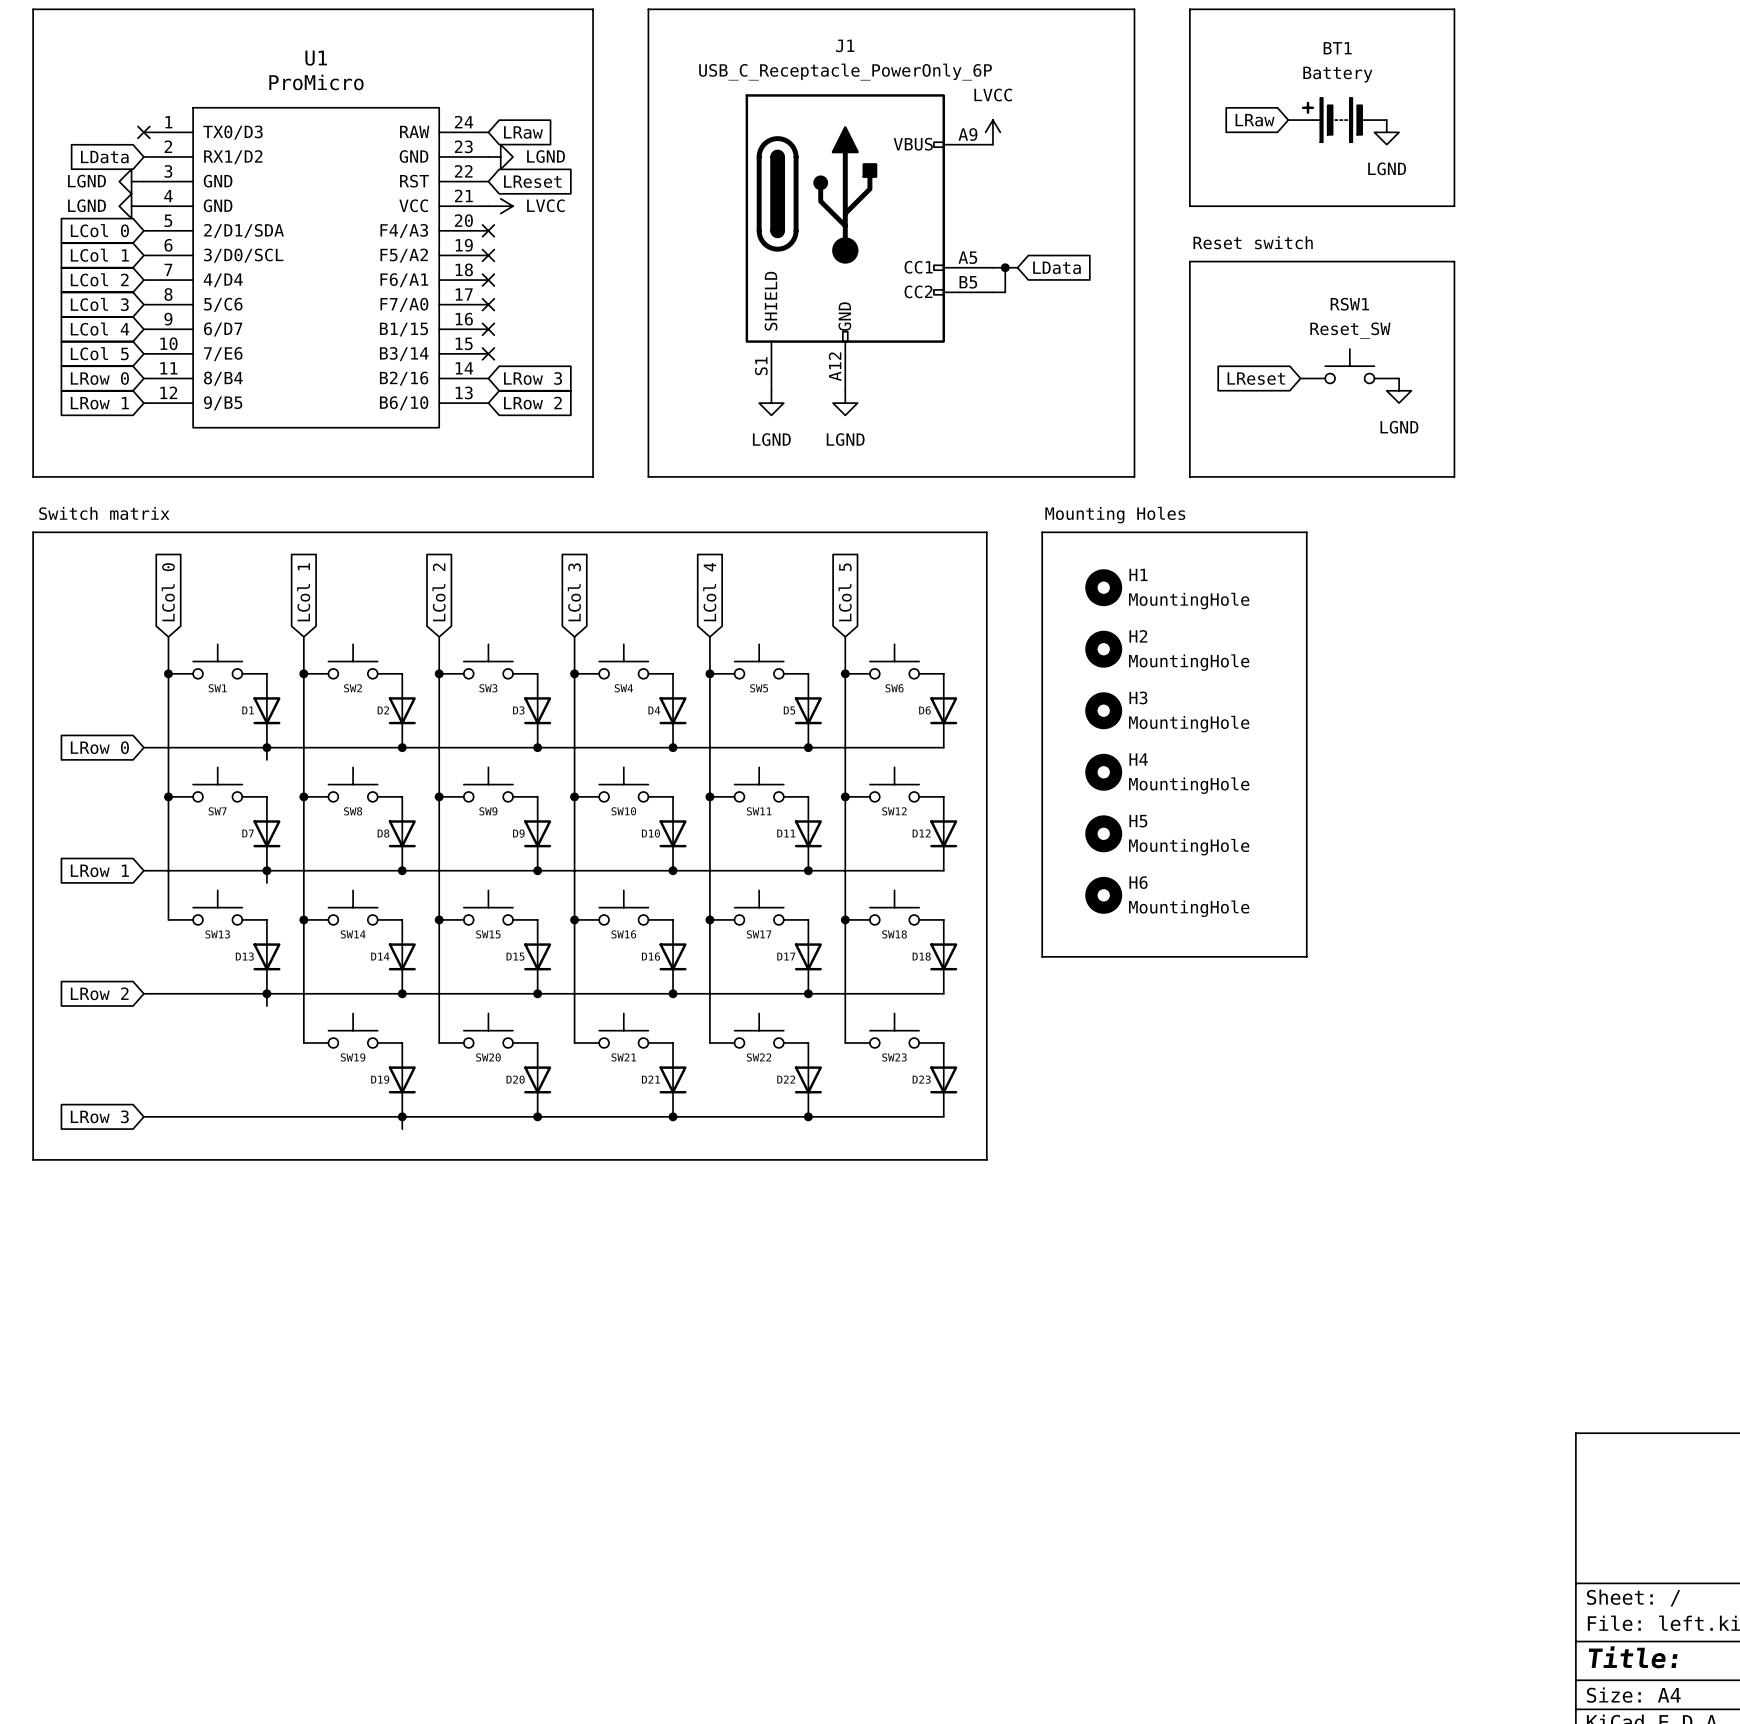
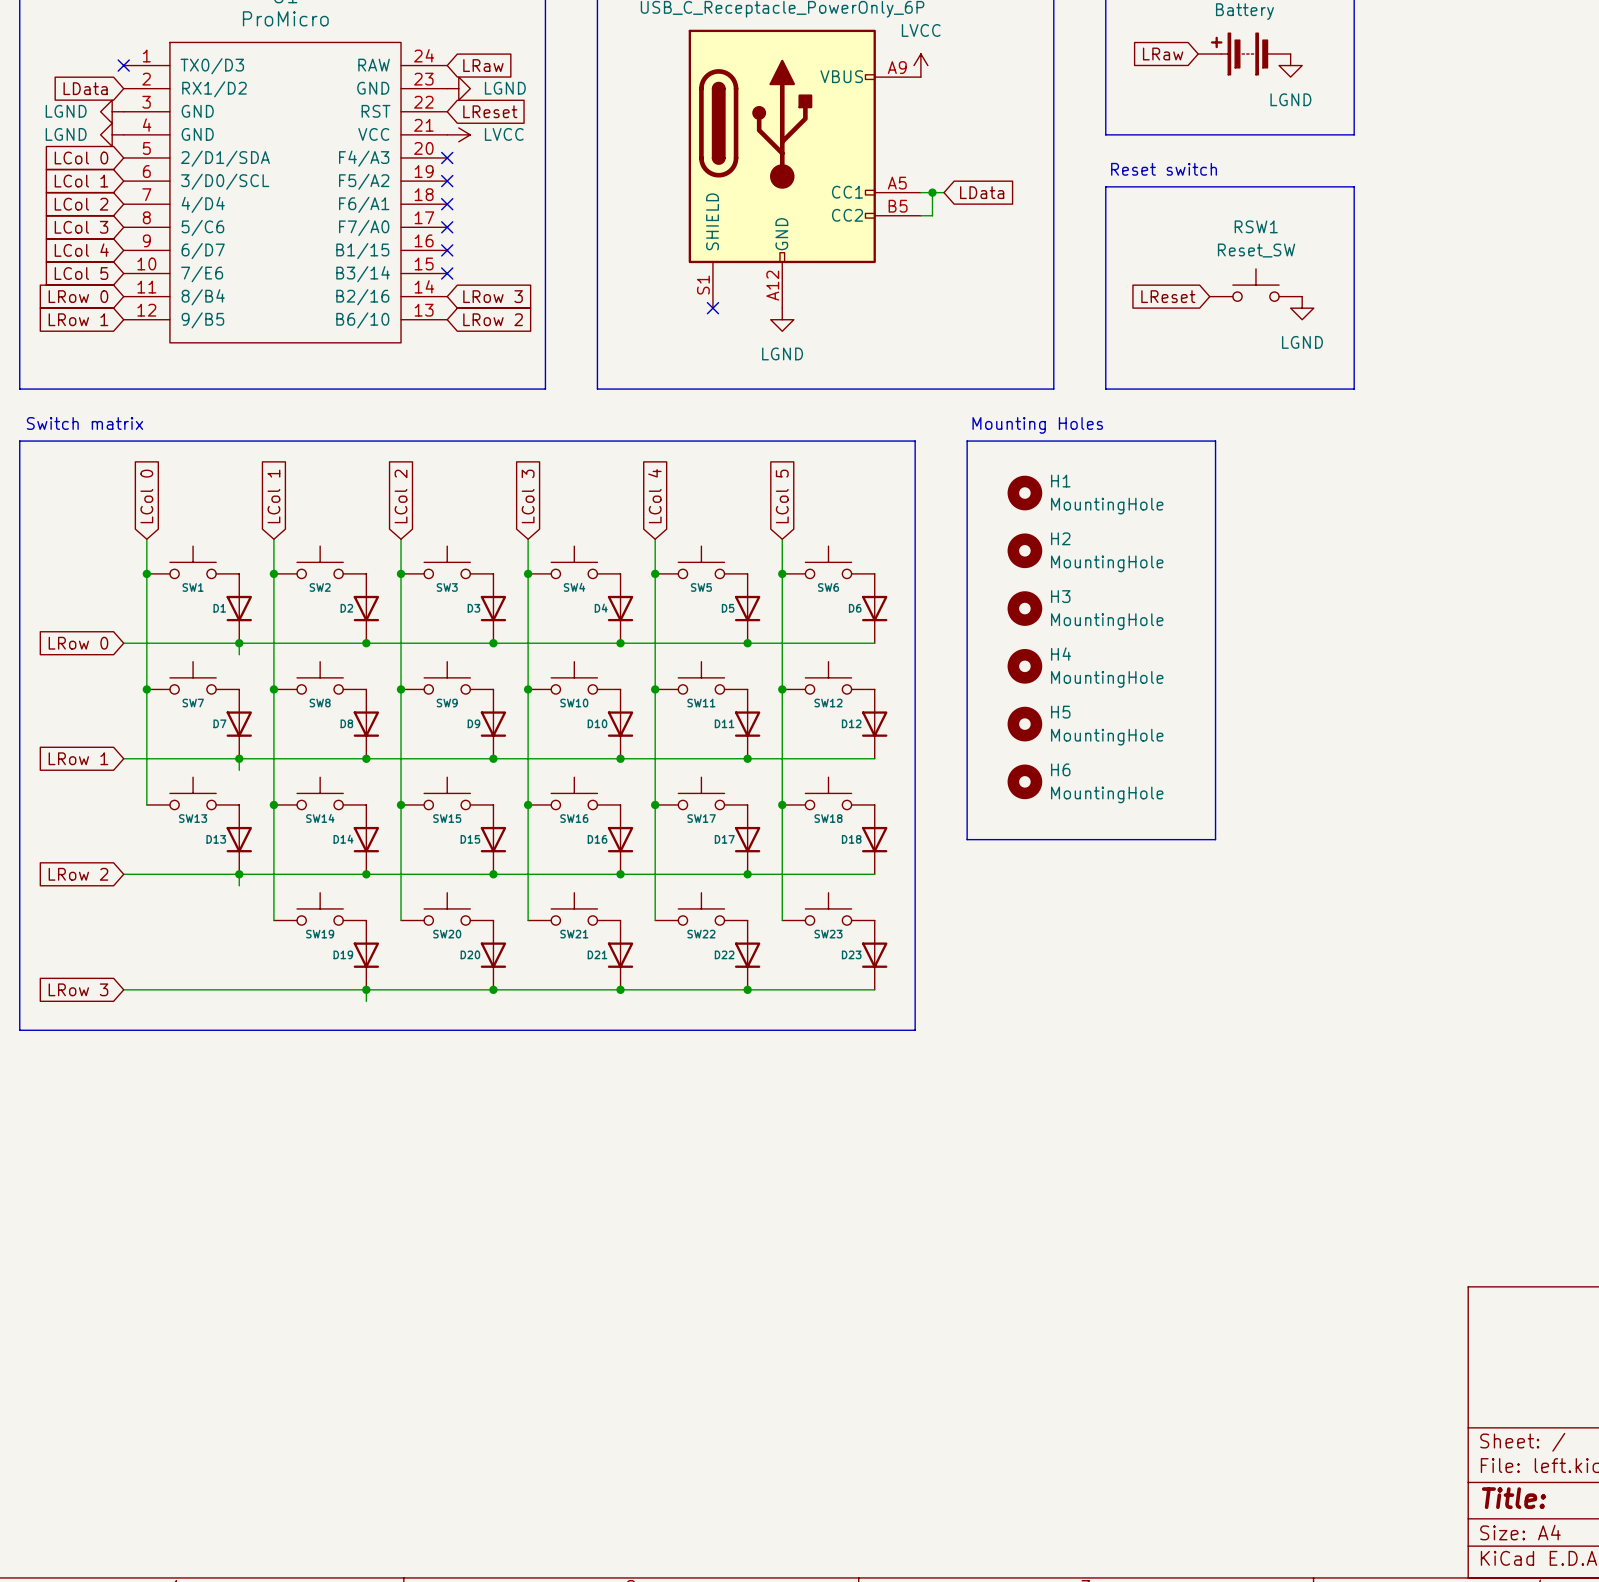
no-connect mark: none -> (712, 308)
power symbol: LGND (771, 403) -> none

